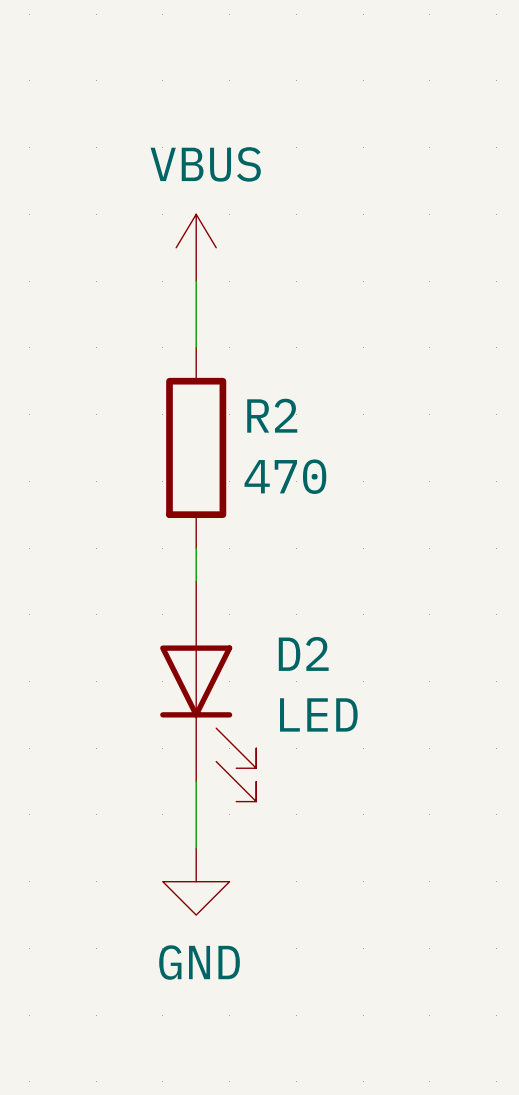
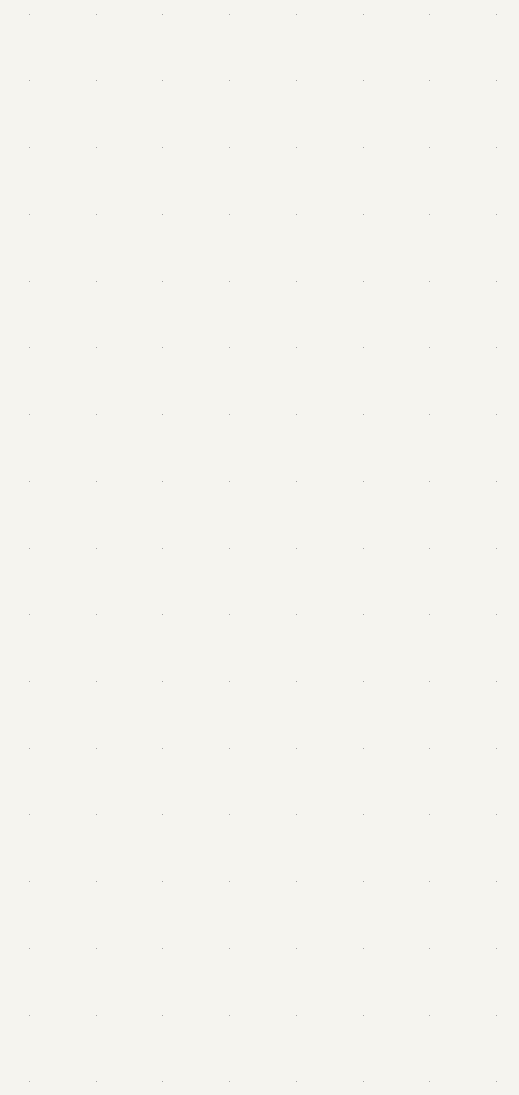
power symbol: VBUS (196, 247) -> none
wire: (196, 281) (196, 347) -> none
R2: 470 (196, 447) -> none
wire: (196, 548) (196, 581) -> none
D2: LED (208, 691) -> none
wire: (196, 781) (196, 848) -> none
power symbol: GND (196, 881) -> none

